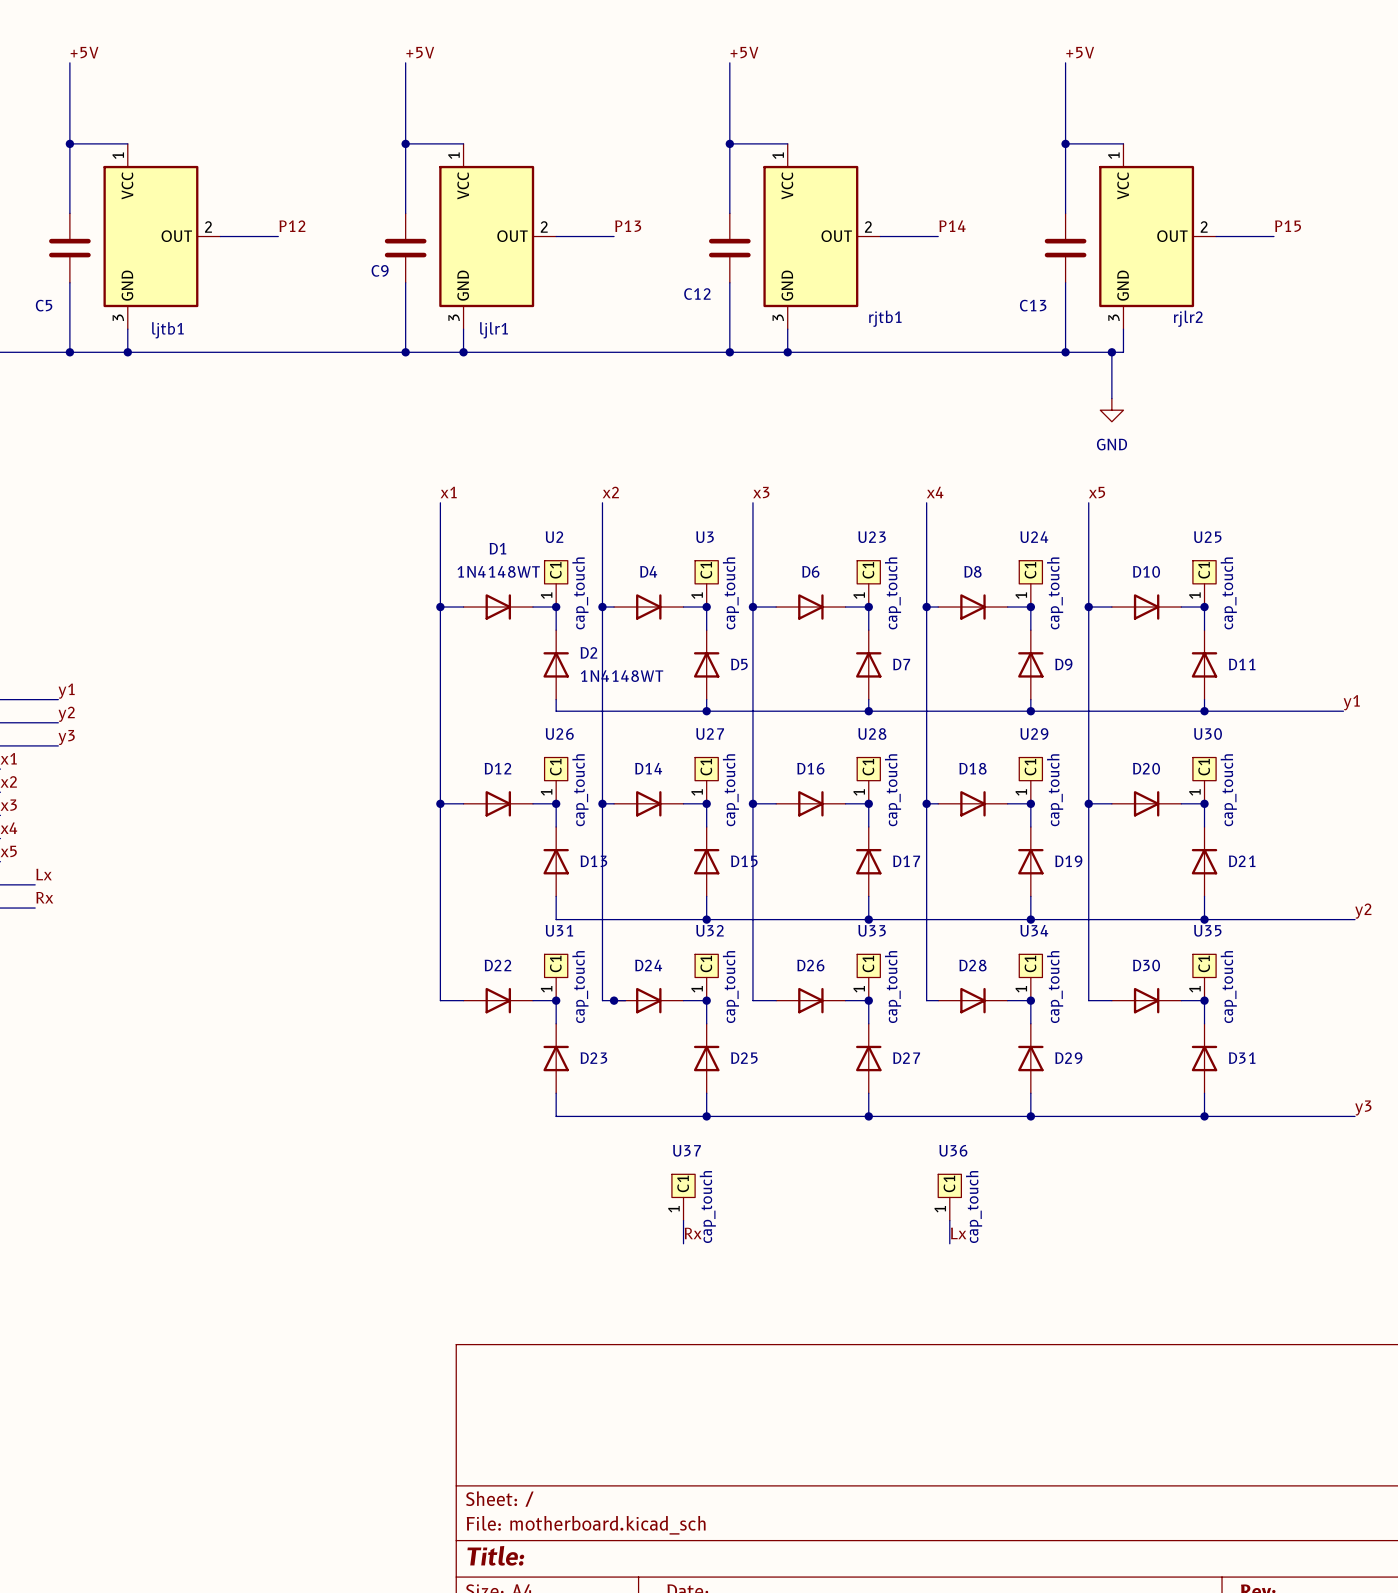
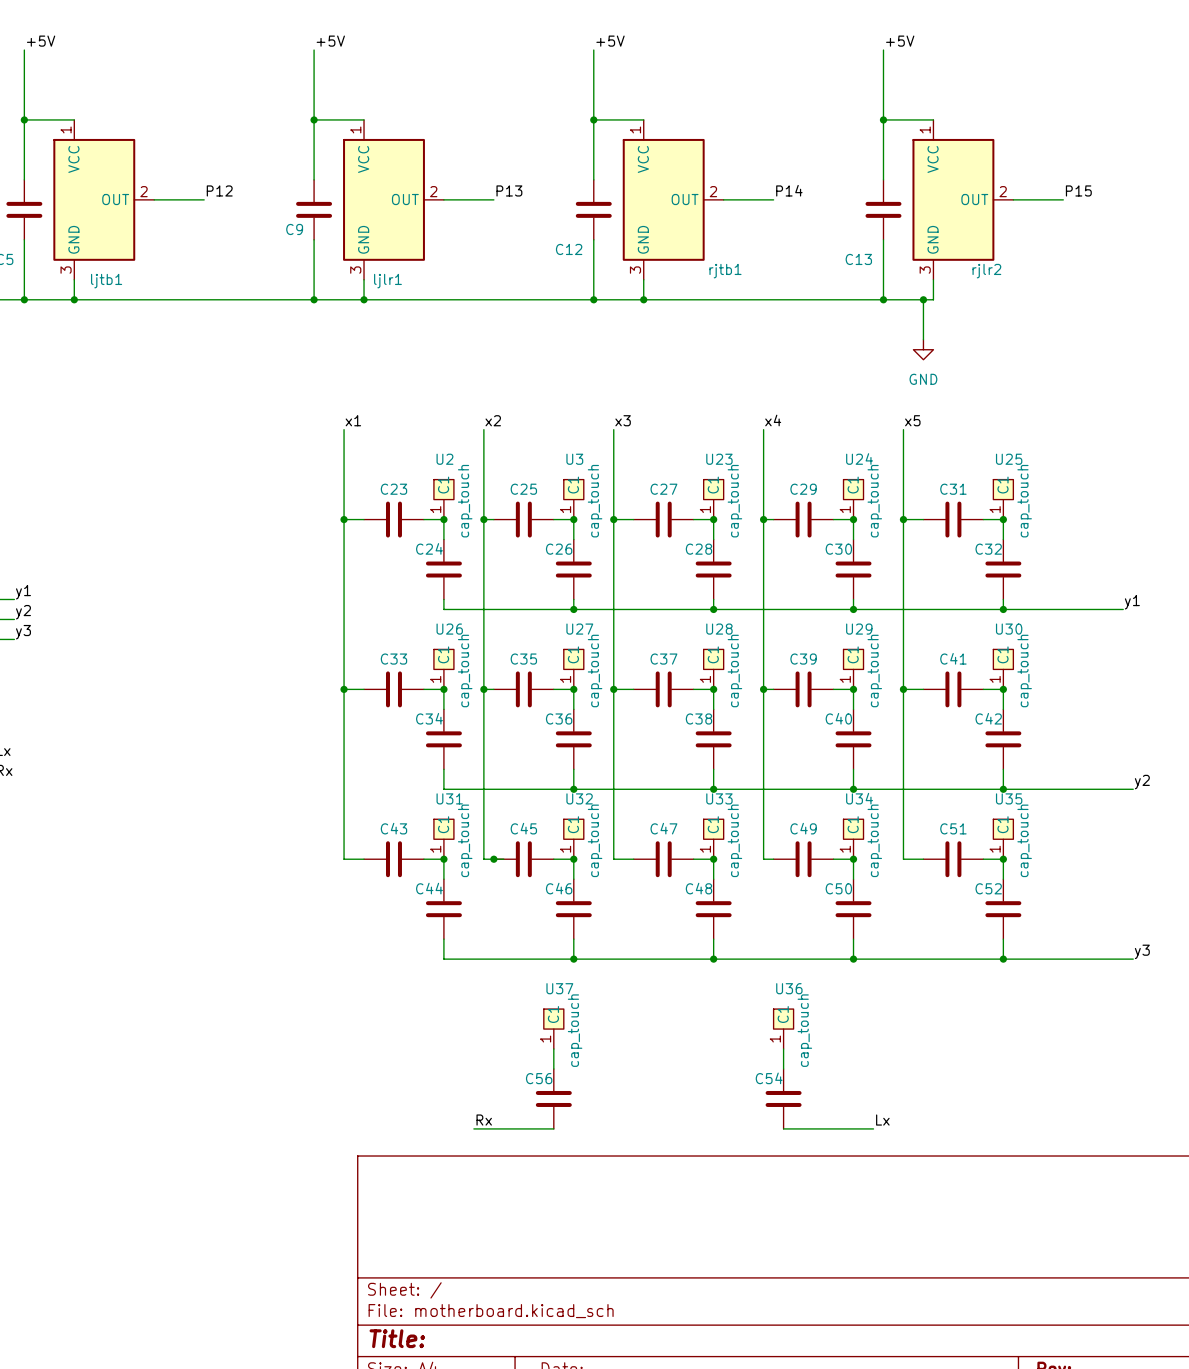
D1: 1N4148WT (498, 607) -> none
C23: none -> (393, 519)
D4: (648, 607) -> none
C25: none -> (523, 519)
D6: (810, 607) -> none
C27: none -> (663, 519)
D8: (972, 607) -> none
C29: none -> (803, 519)
D10: (1146, 607) -> none
C31: none -> (953, 519)
D2: 1N4148WT (556, 664) -> none
C24: none -> (443, 569)
D5: (706, 664) -> none
C26: none -> (573, 569)
D7: (868, 664) -> none
C28: none -> (713, 569)
D9: (1030, 664) -> none
C30: none -> (853, 569)
D11: (1204, 664) -> none
C32: none -> (1003, 569)
D12: (498, 803) -> none
C33: none -> (393, 689)
D14: (648, 803) -> none
C35: none -> (523, 689)
D16: (810, 803) -> none
C37: none -> (663, 689)
D18: (972, 803) -> none
C39: none -> (803, 689)
D20: (1146, 803) -> none
C41: none -> (953, 689)
D13: (556, 861) -> none
C34: none -> (443, 739)
D15: (706, 861) -> none
C36: none -> (573, 739)
D17: (868, 861) -> none
C38: none -> (713, 739)
D19: (1030, 861) -> none
C40: none -> (853, 739)
D21: (1204, 861) -> none
C42: none -> (1003, 739)
D22: (498, 1000) -> none
C43: none -> (393, 859)
D24: (648, 1000) -> none
C45: none -> (523, 859)
D26: (810, 1000) -> none
C47: none -> (663, 859)
D28: (972, 1000) -> none
C49: none -> (803, 859)
D30: (1146, 1000) -> none
C51: none -> (953, 859)
D23: (556, 1058) -> none
C44: none -> (443, 909)
D25: (706, 1058) -> none
C46: none -> (573, 909)
D27: (868, 1058) -> none
C48: none -> (713, 909)
D29: (1030, 1058) -> none
C50: none -> (853, 909)
D31: (1204, 1058) -> none
C52: none -> (1003, 909)
label position: Rx (693, 1233) -> Rx (484, 1120)
label position: Lx (958, 1233) -> Lx (882, 1120)
C56: none -> (553, 1098)
C54: none -> (783, 1098)
wire: none -> (473, 1128) (553, 1128)
wire: none -> (783, 1128) (873, 1128)

